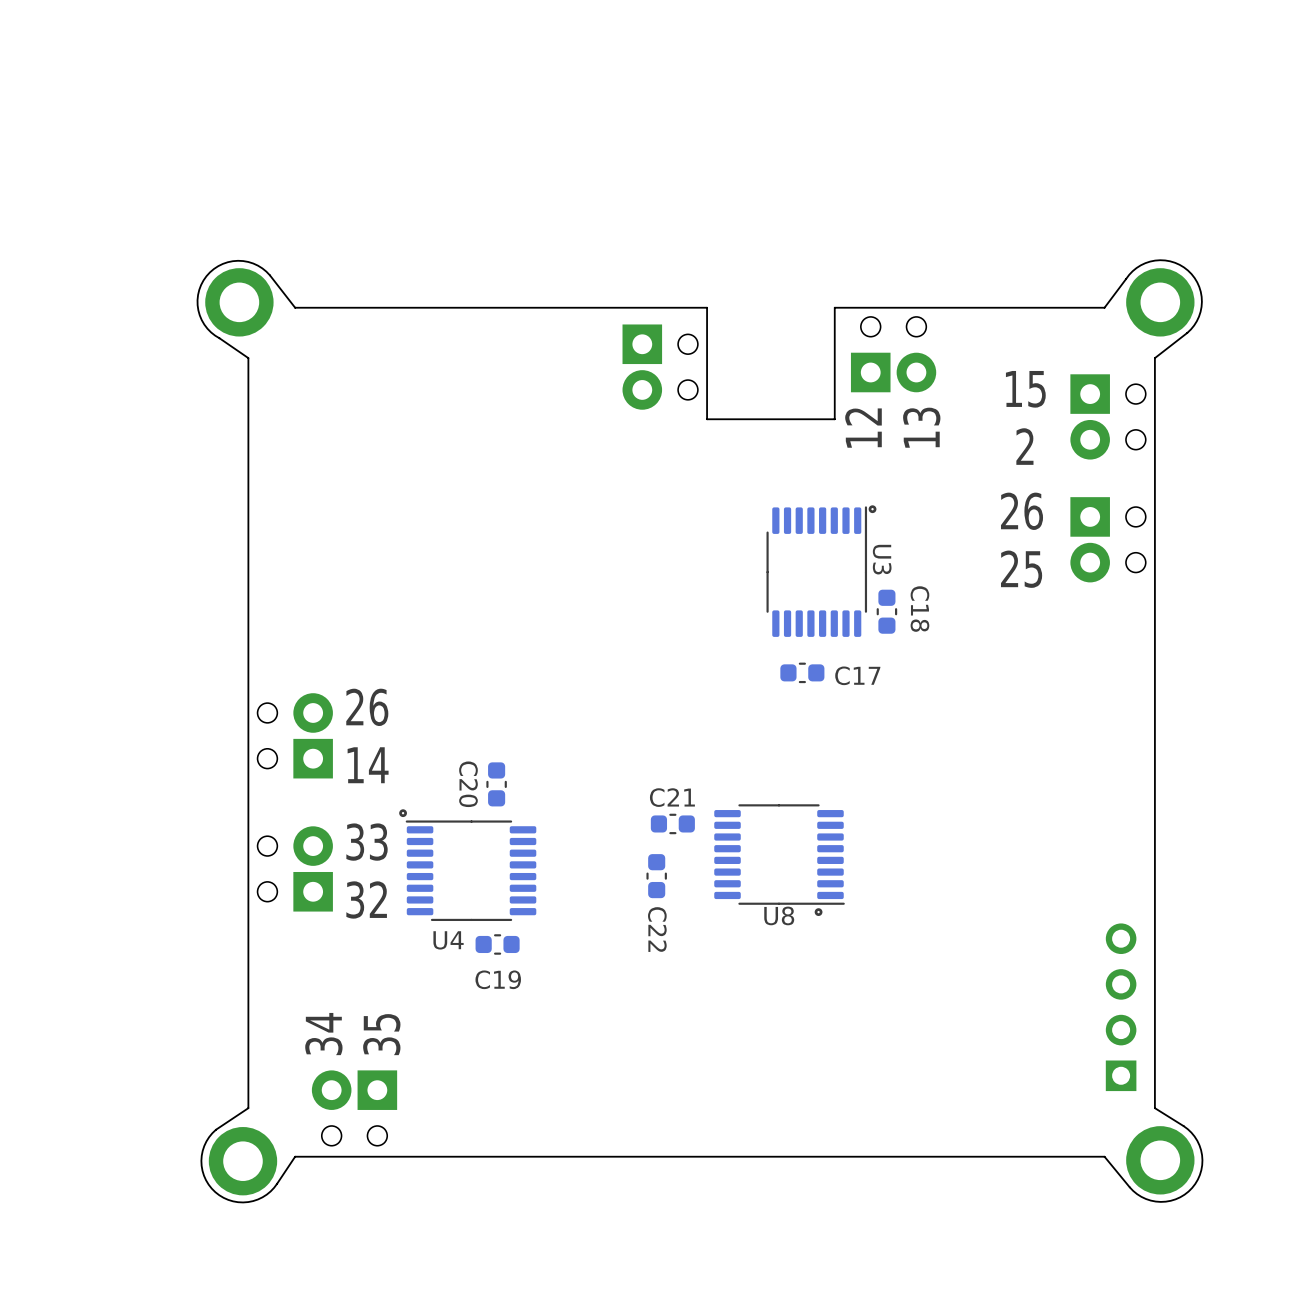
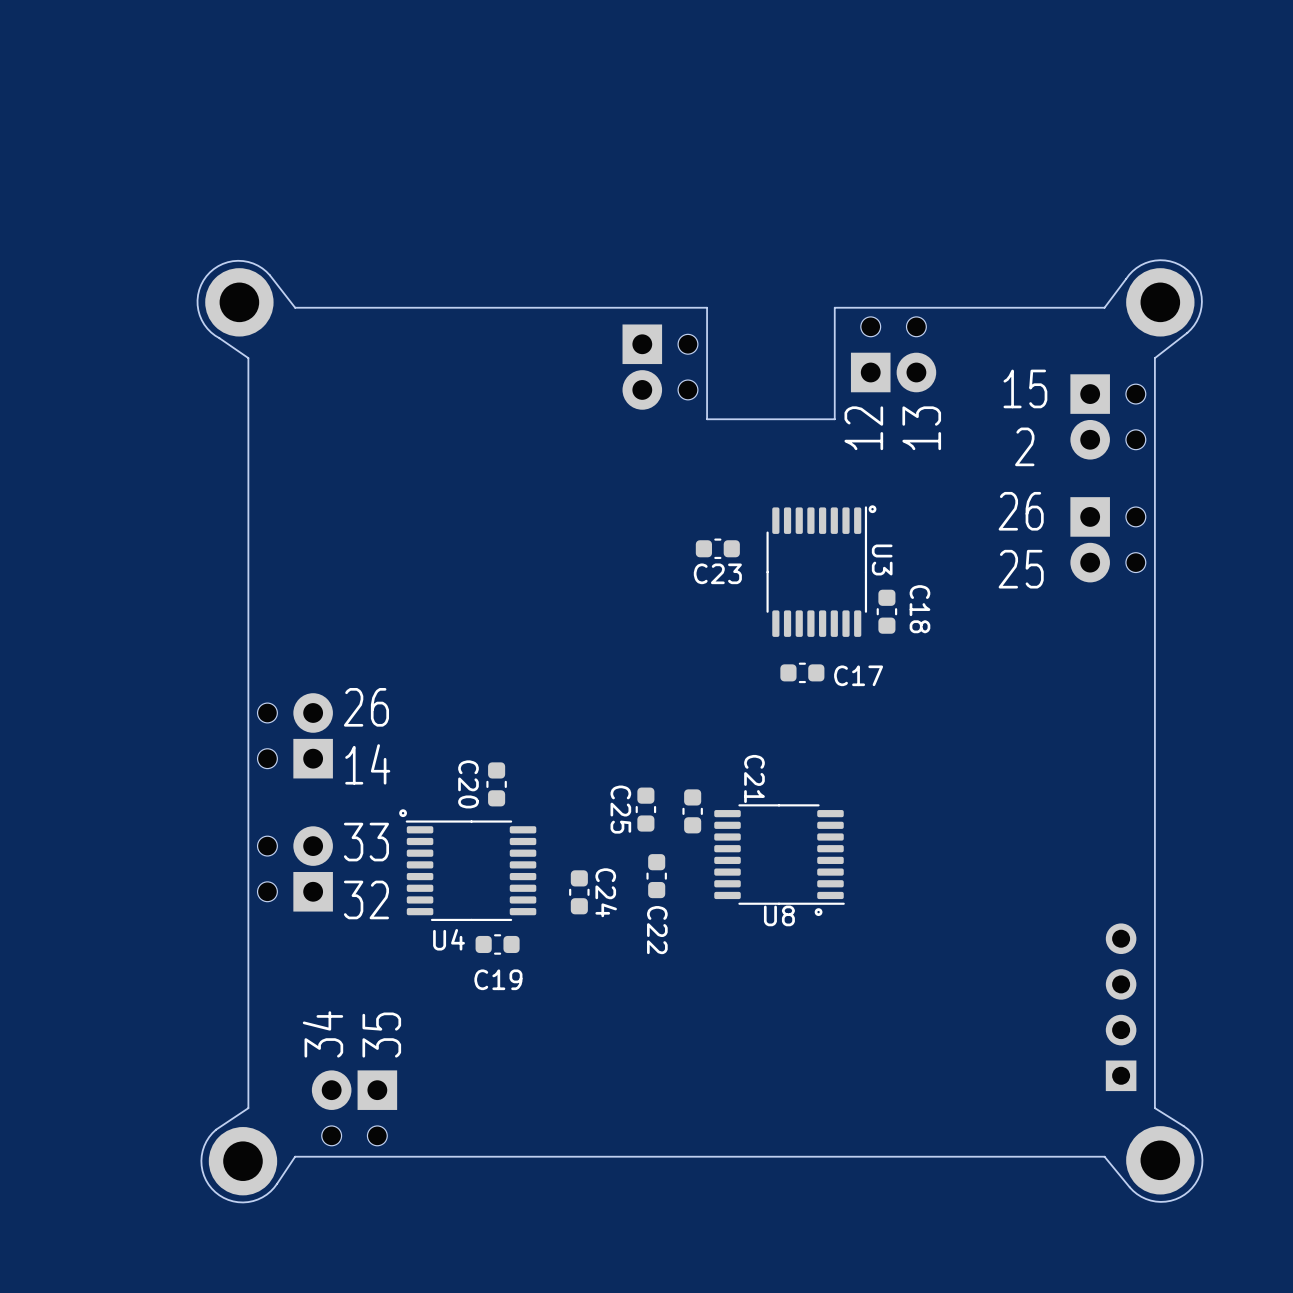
C23: none -> (717, 548)
C21 name position: C21 (672, 797) -> C21 (754, 779)
C25: none -> (645, 809)
C21 rotation: 0° (672, 823) -> 90° clockwise (692, 811)
C24: none -> (579, 892)

